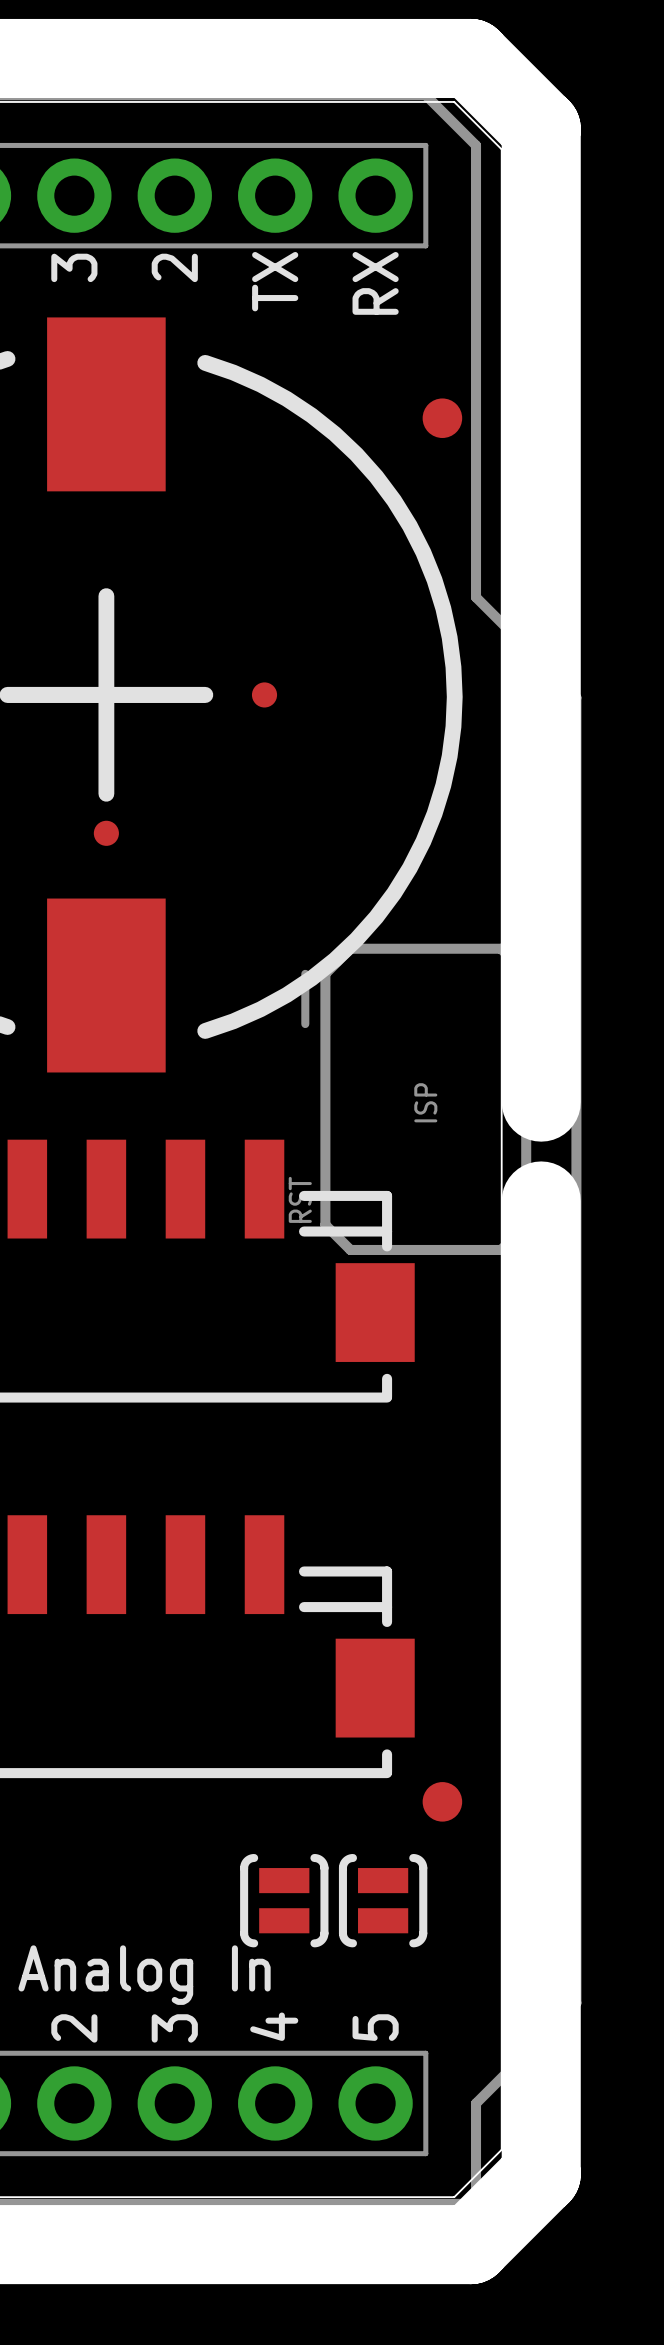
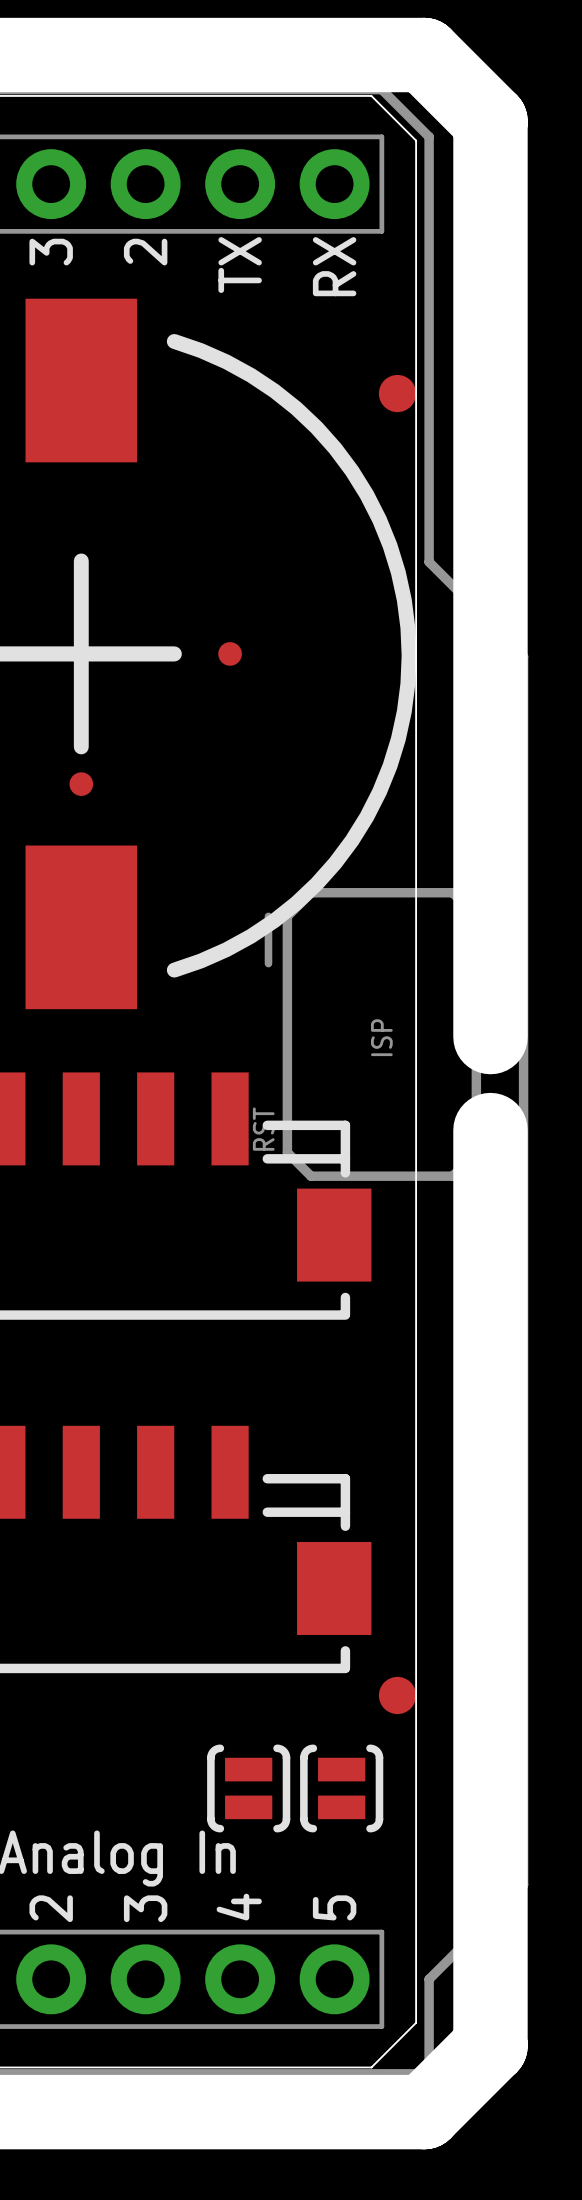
board edge: (414, 101) (454, 101) (501, 149) (501, 2149) (454, 2197) (414, 2197) -> (371, 95) (416, 140) (416, 2022) (371, 2067)

